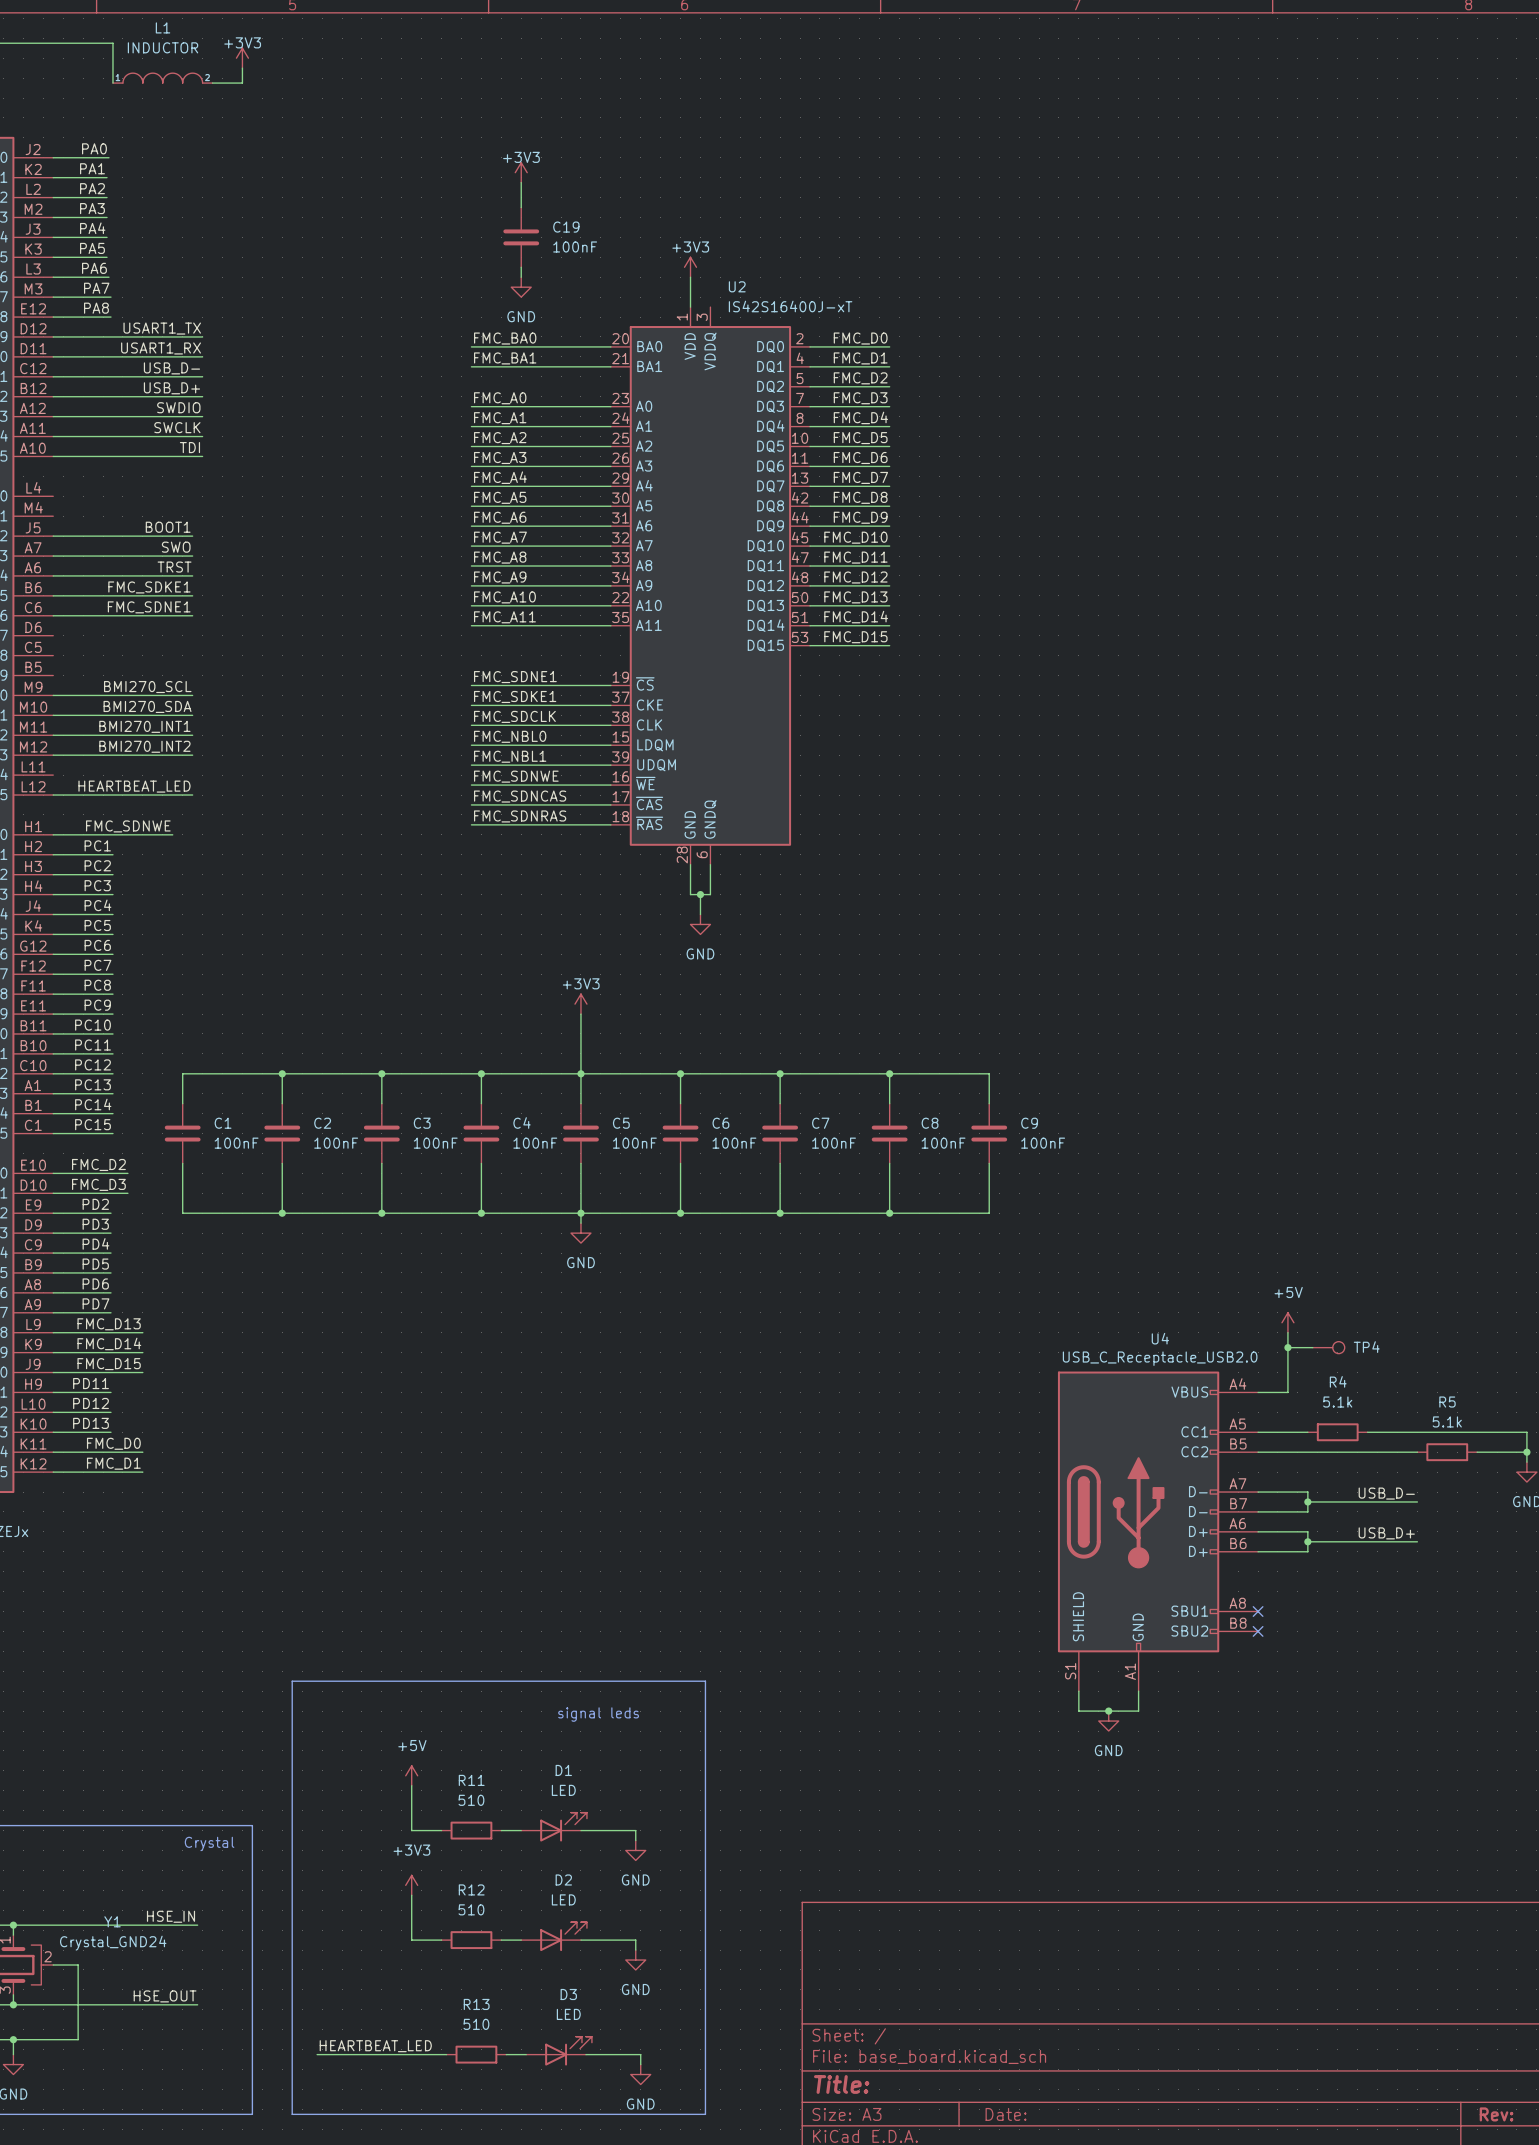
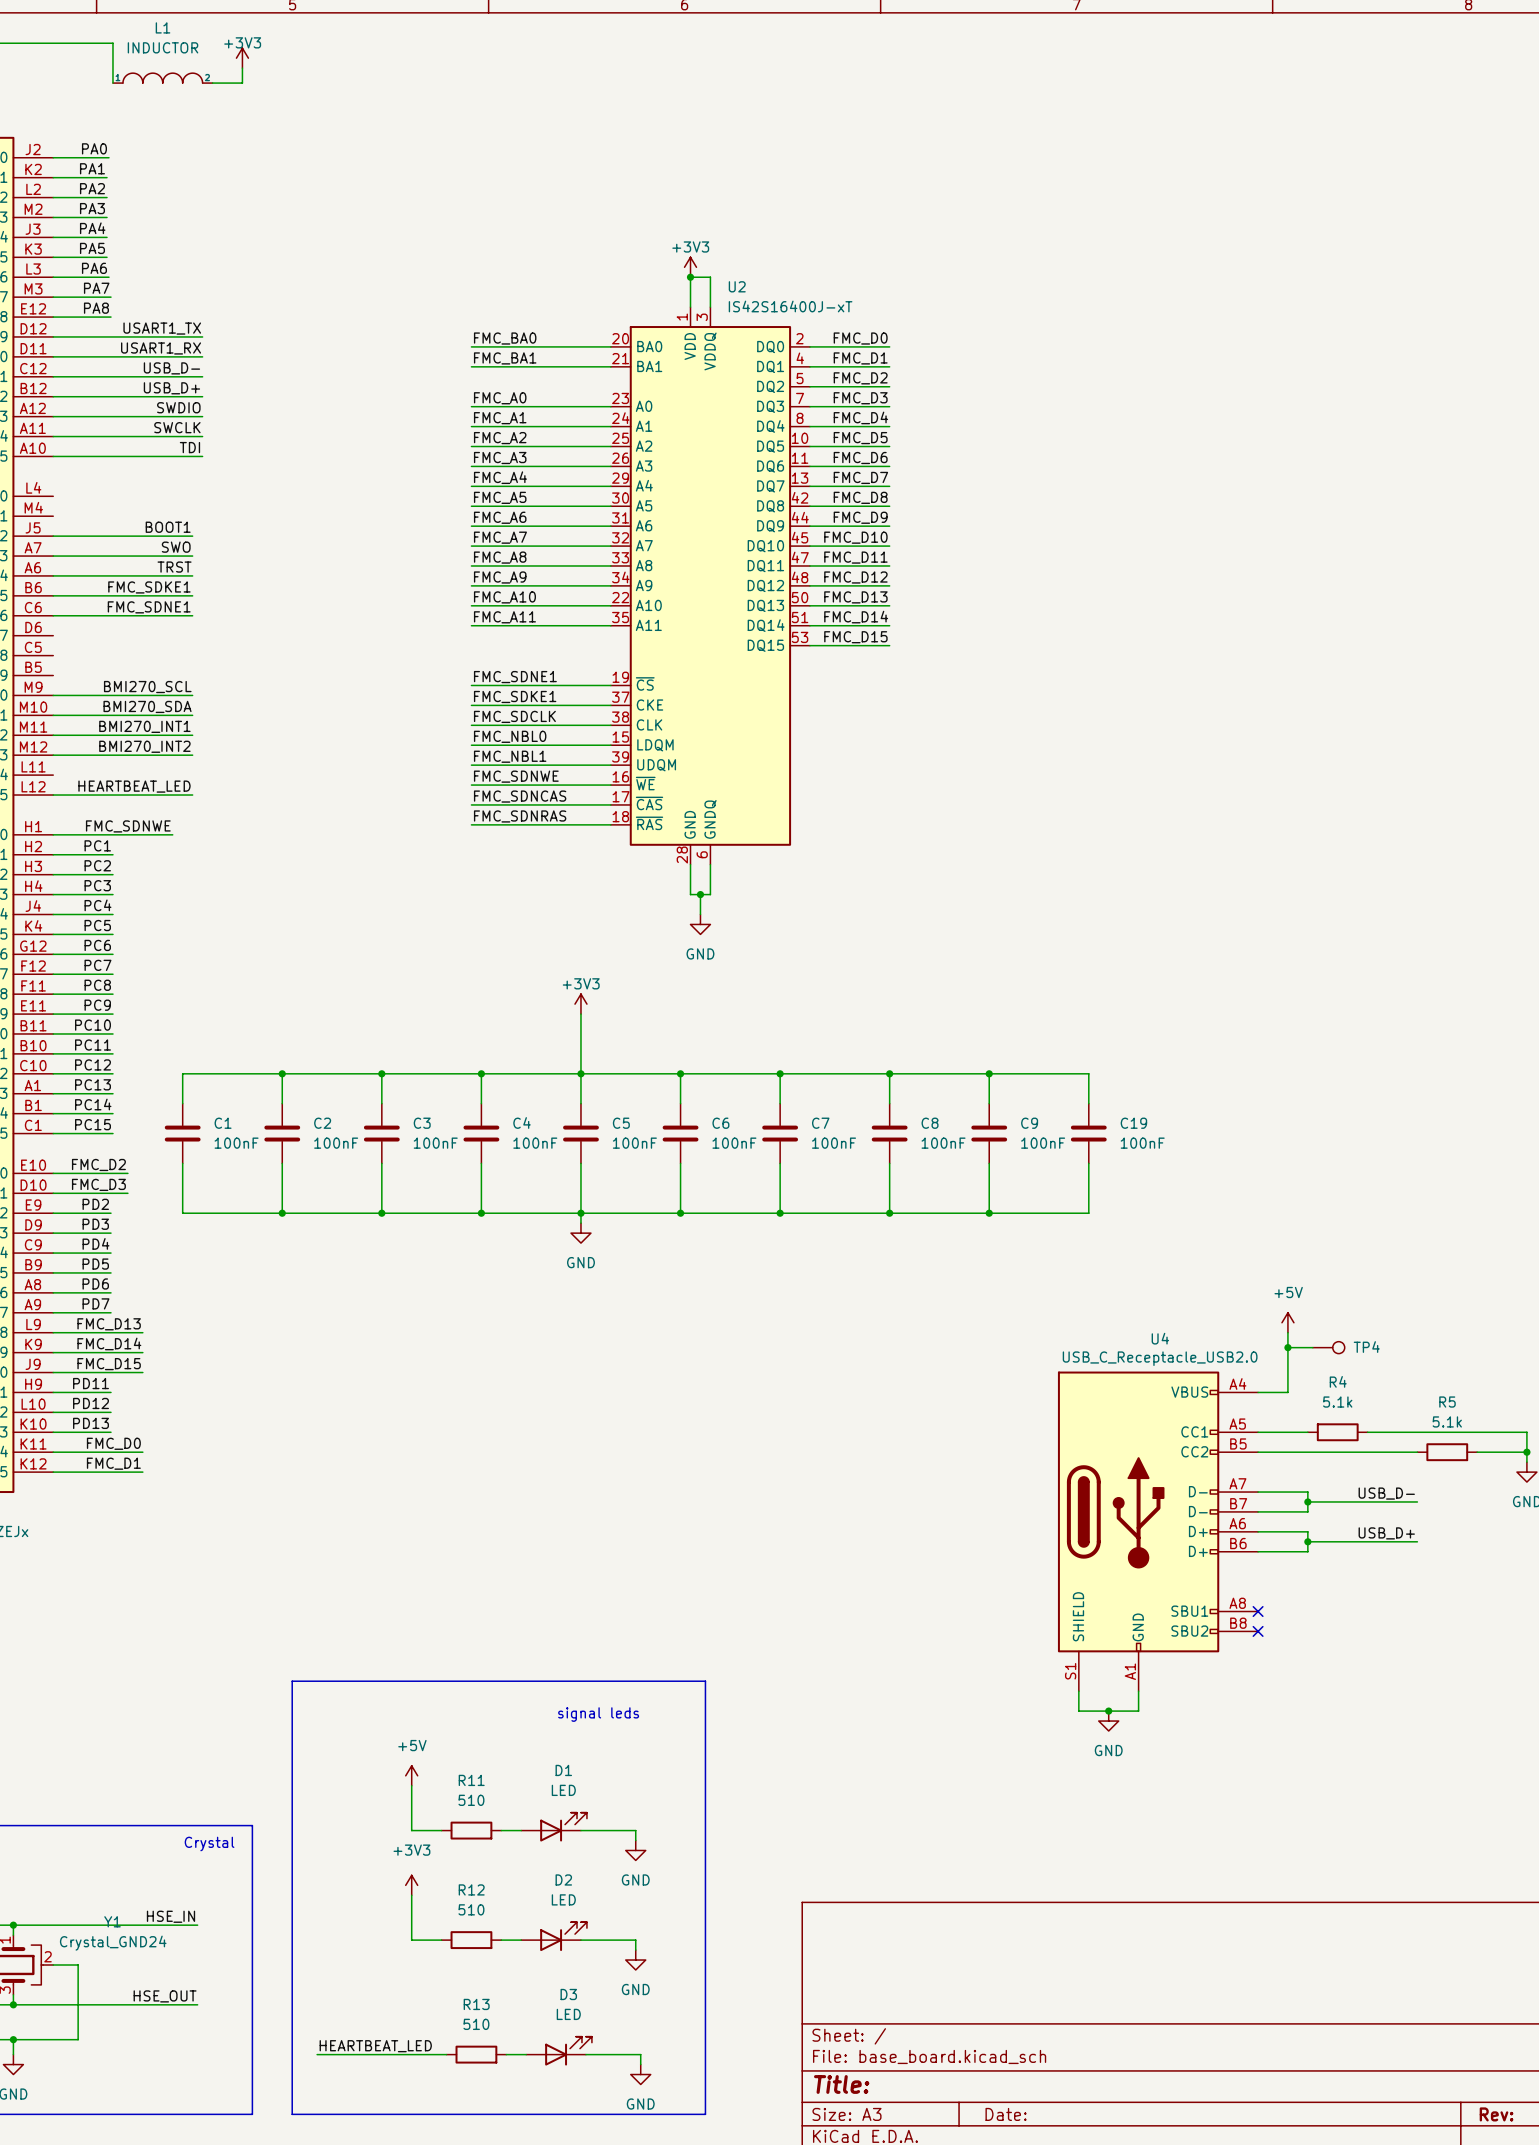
power symbol: +3V3 (521, 172) -> none
wire: (521, 182) (521, 207) -> none
C19 position: (521, 237) -> (1088, 1133)
wire: (521, 267) (521, 277) -> none
wire: none -> (690, 277) (710, 277) (710, 307)
junction: none -> (690, 277)
power symbol: GND (521, 287) -> none
wire: none -> (989, 1073) (1088, 1073) (1088, 1103)
junction: none -> (989, 1073)
wire: none -> (1088, 1163) (1088, 1213) (989, 1213)
junction: none -> (989, 1213)

